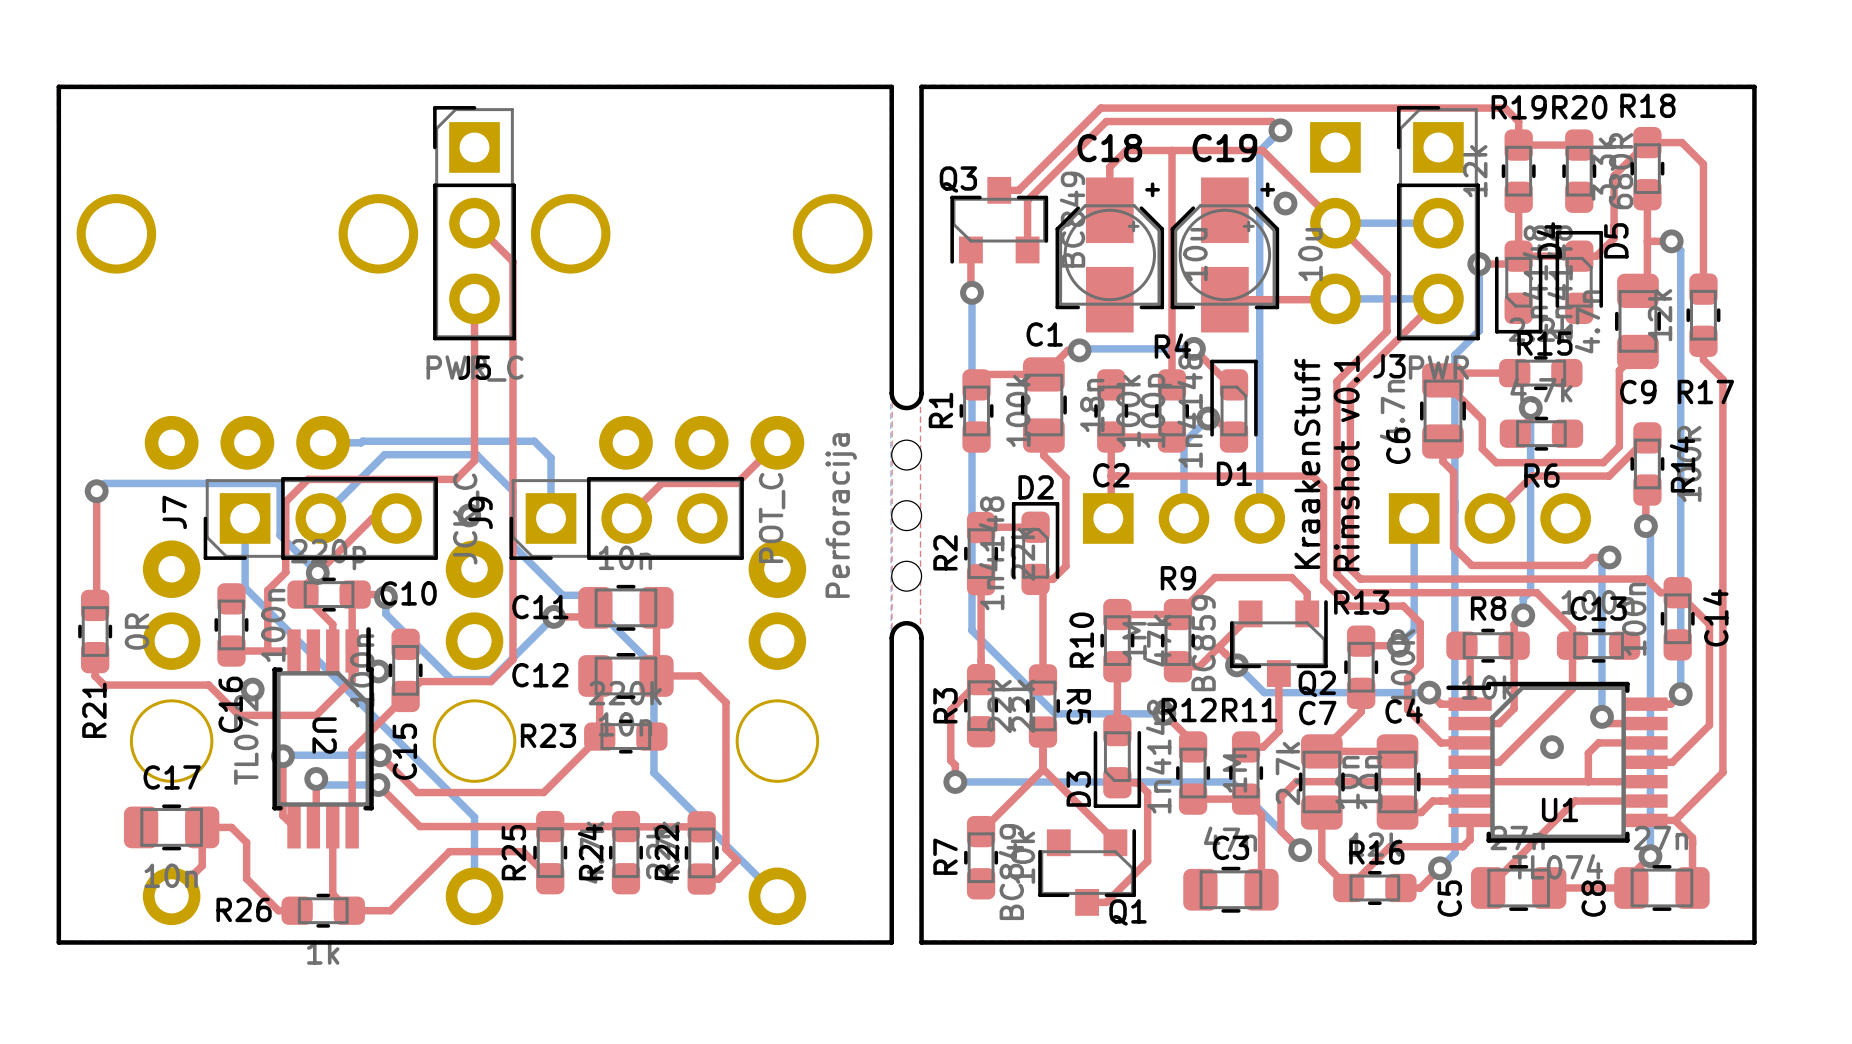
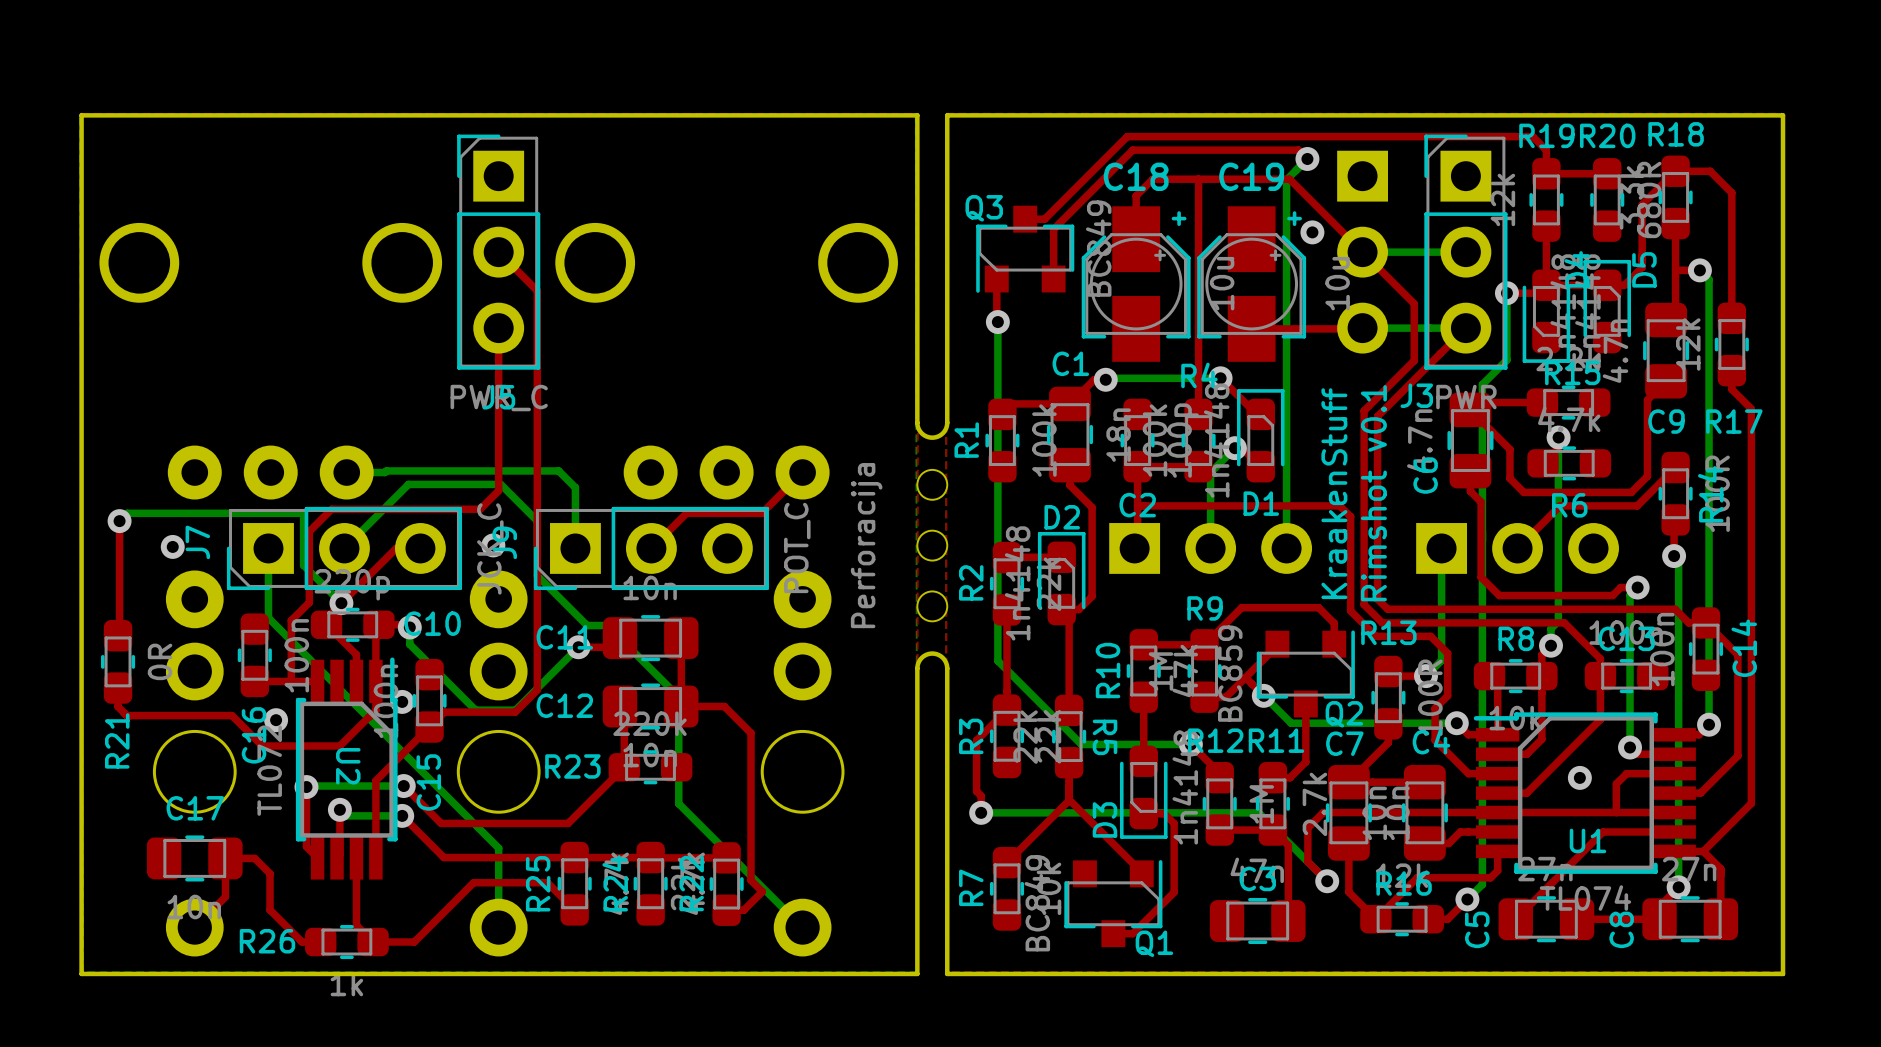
via: none -> (172, 546)

